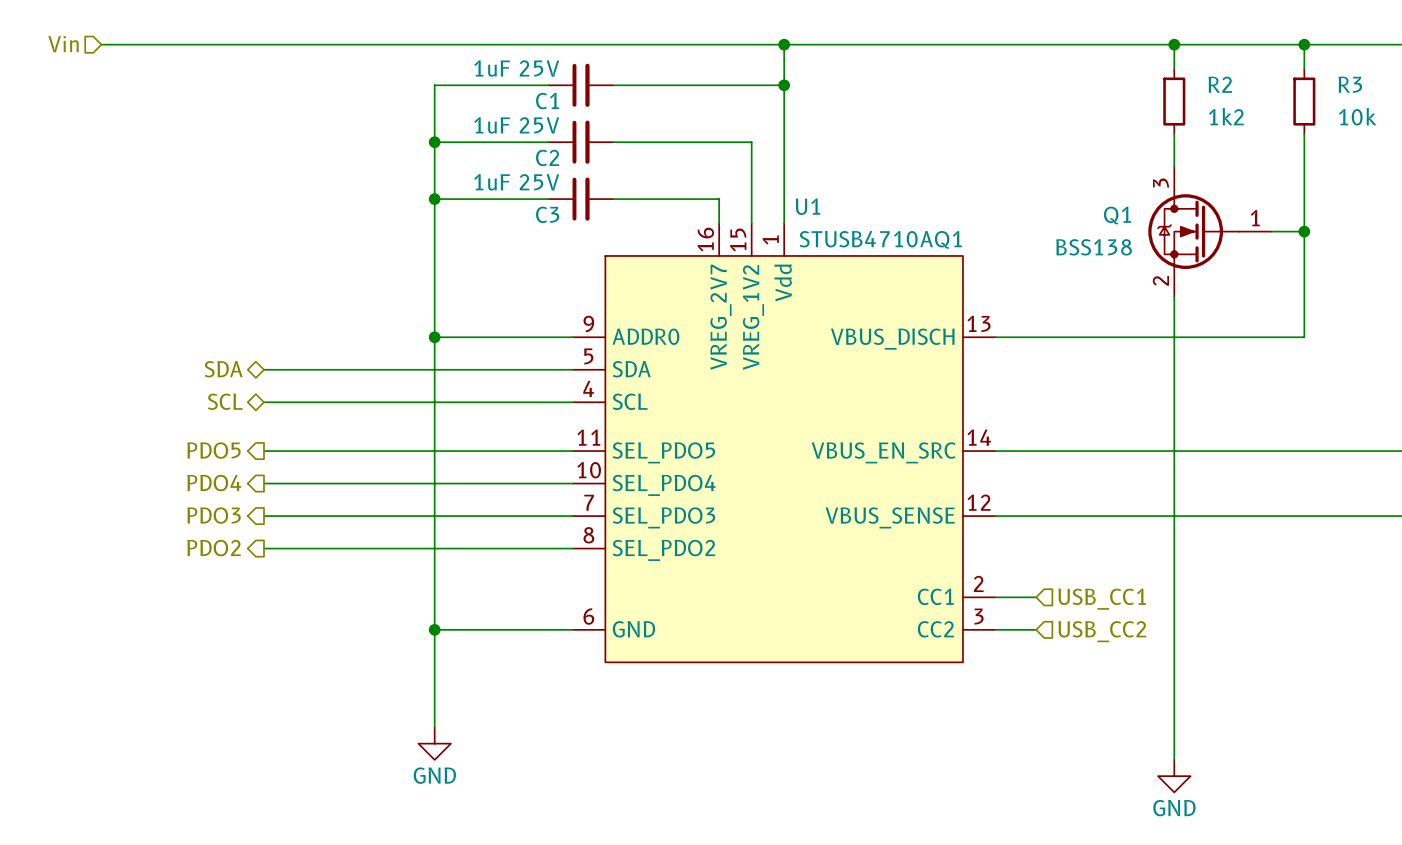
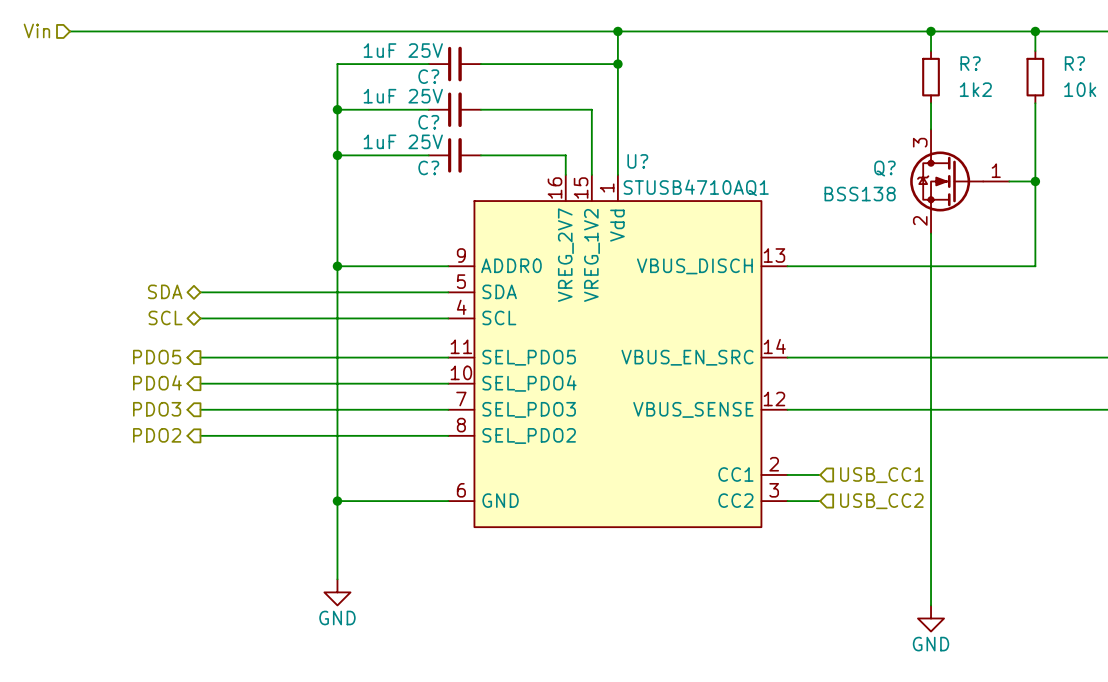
R2 name: R2 (1220, 84) -> R? (970, 63)
R3 name: R3 (1350, 84) -> R? (1074, 63)
C1 name: C1 (547, 101) -> C? (428, 76)
C2 name: C2 (547, 157) -> C? (428, 122)
U1 name: U1 (808, 206) -> U? (637, 161)
C3 name: C3 (547, 214) -> C? (428, 167)
Q1 name: Q1 (1117, 215) -> Q? (884, 168)

